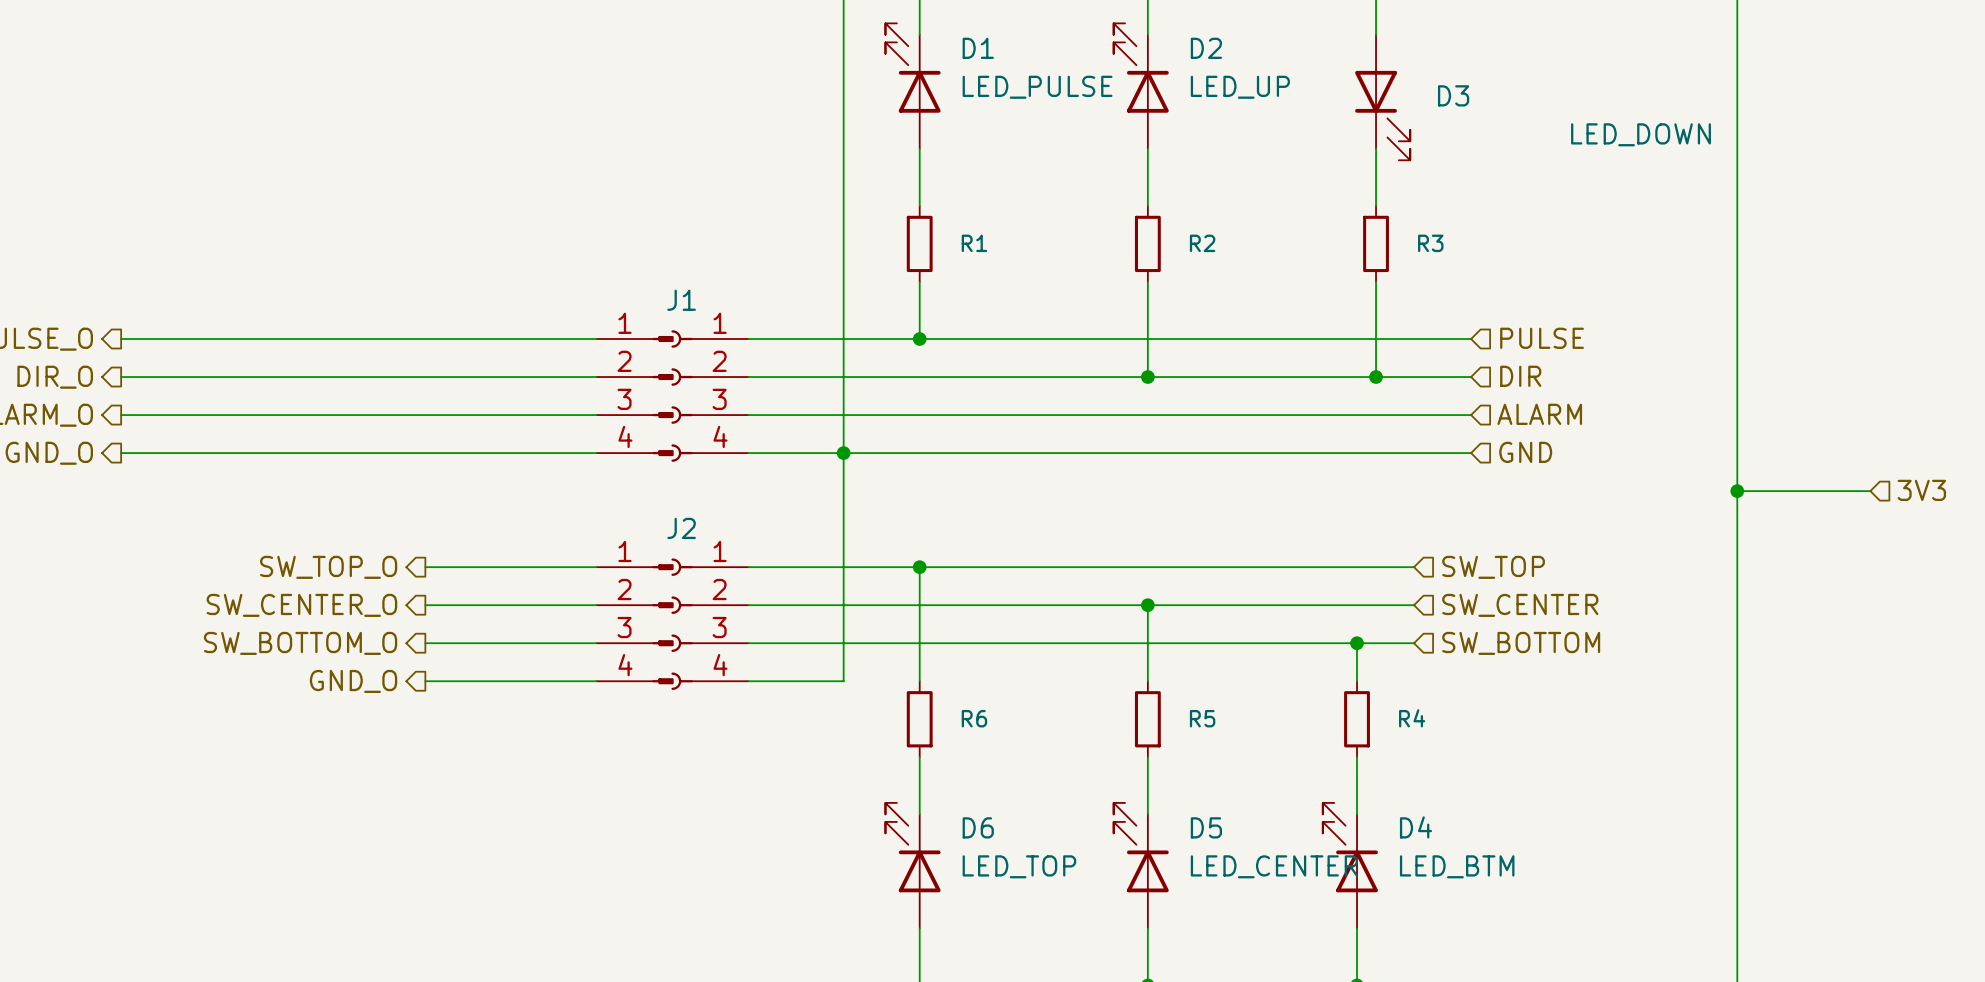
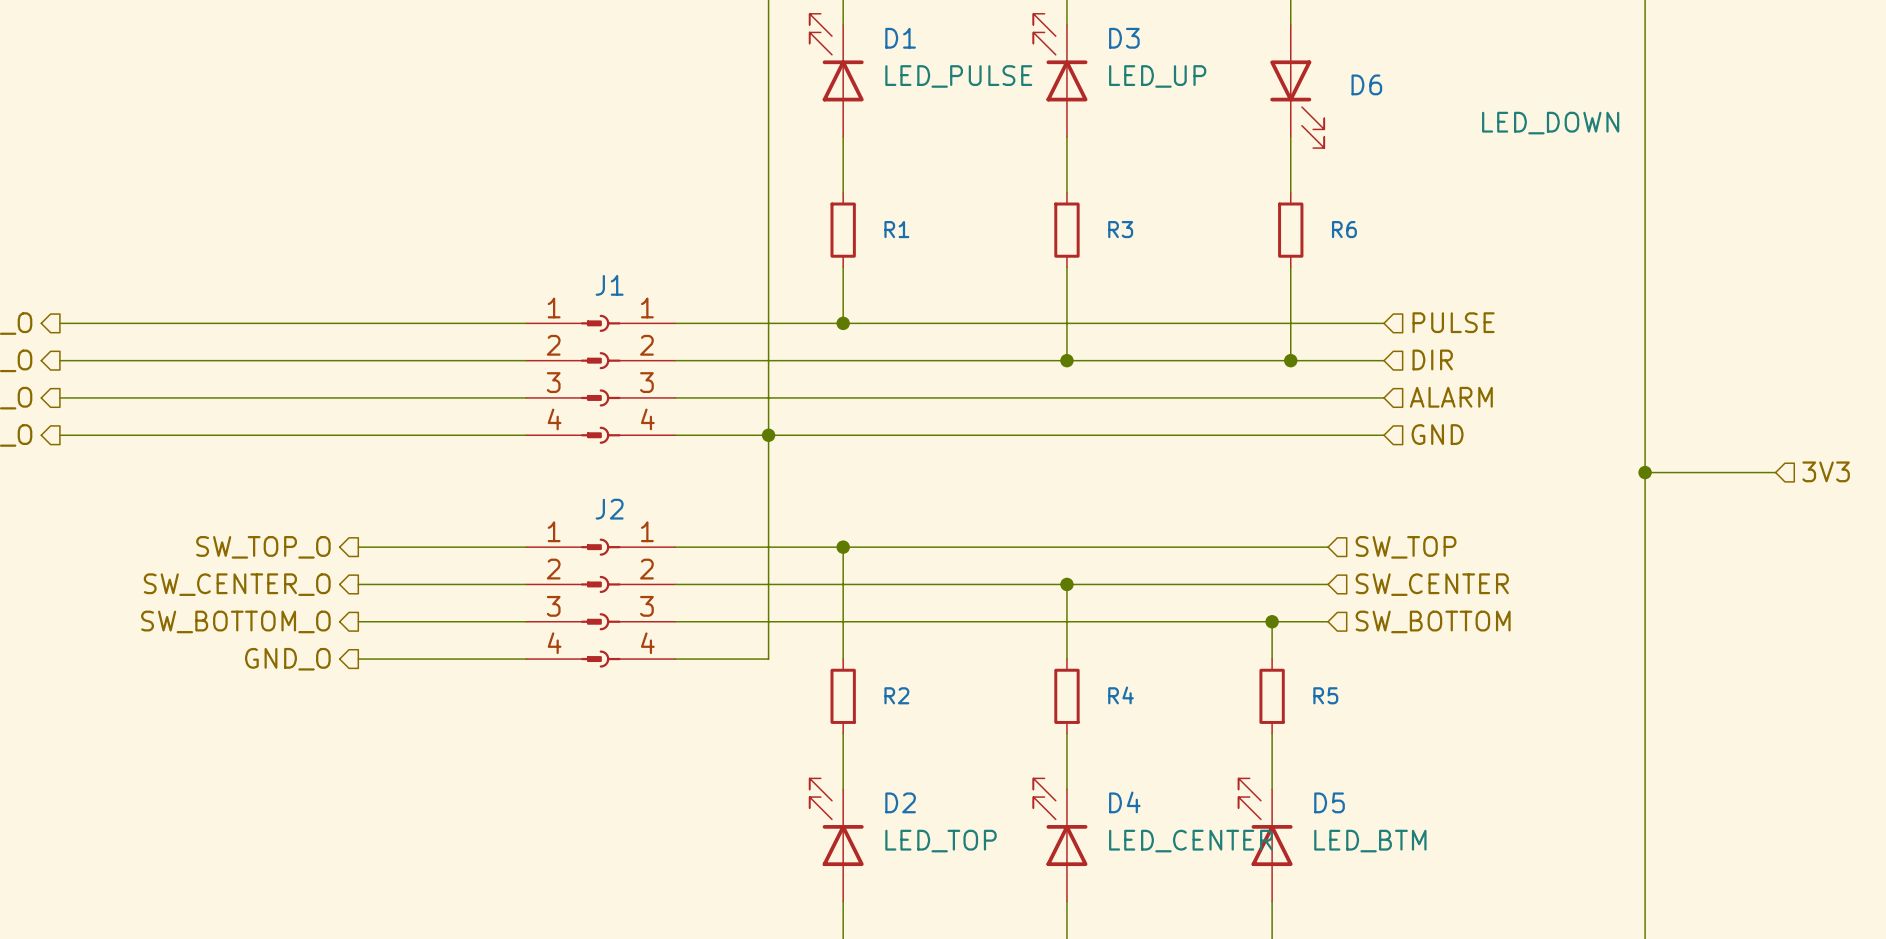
D2 name: D2 (1206, 48) -> D3 (1124, 38)
D3 name: D3 (1453, 95) -> D6 (1366, 84)
R2 name: R2 (1202, 243) -> R3 (1120, 229)
R3 name: R3 (1430, 243) -> R6 (1344, 229)
R6 name: R6 (974, 718) -> R2 (896, 695)
R5 name: R5 (1202, 718) -> R4 (1121, 695)
R4 name: R4 (1412, 718) -> R5 (1325, 695)
D6 name: D6 (978, 827) -> D2 (900, 802)
D5 name: D5 (1206, 827) -> D4 (1124, 802)
D4 name: D4 (1416, 827) -> D5 (1329, 802)

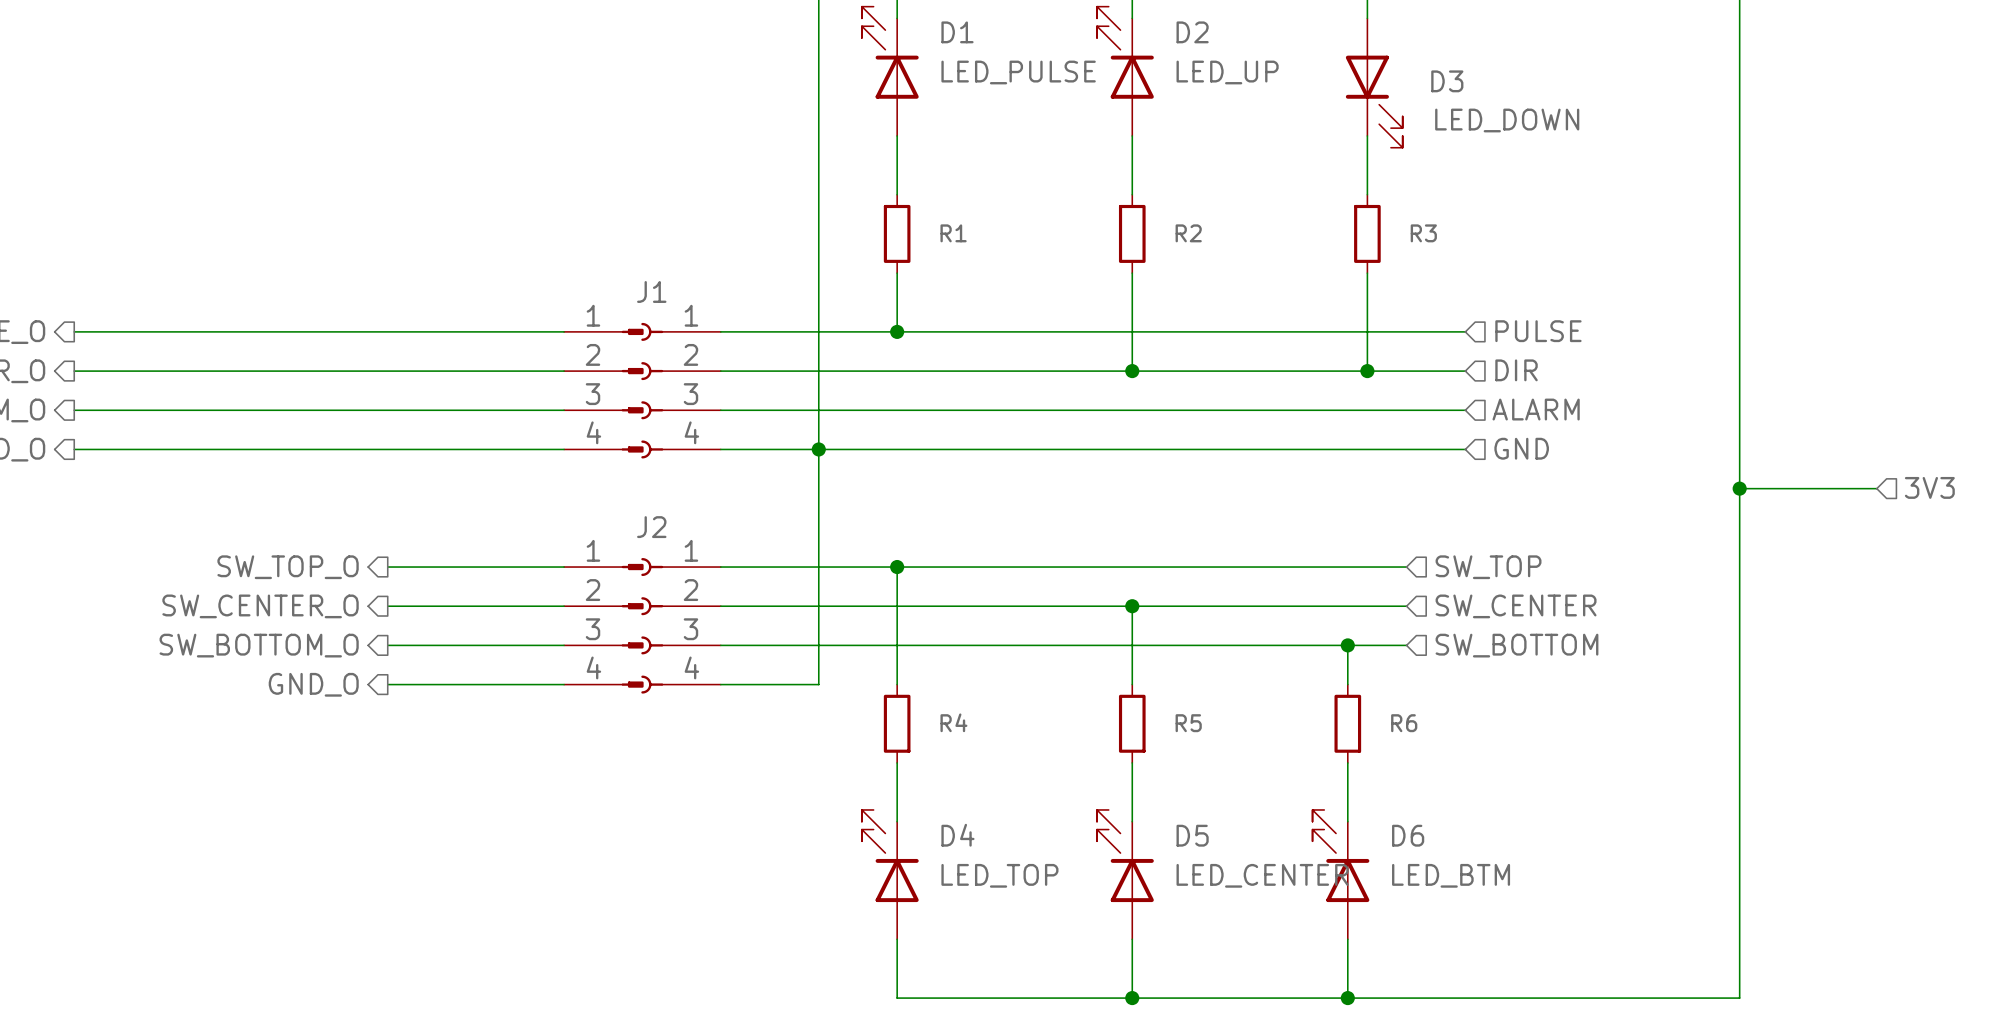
D3 name: D3 (1124, 38) -> D2 (1192, 32)
D6 name: D6 (1366, 84) -> D3 (1447, 81)
D6 value position: LED_DOWN (1550, 123) -> LED_DOWN (1507, 120)
R3 name: R3 (1120, 229) -> R2 (1188, 233)
R6 name: R6 (1344, 229) -> R3 (1423, 233)
R2 name: R2 (896, 695) -> R4 (953, 722)
R4 name: R4 (1121, 695) -> R5 (1188, 723)
R5 name: R5 (1325, 695) -> R6 (1404, 723)
D2 name: D2 (900, 802) -> D4 (957, 835)
D4 name: D4 (1124, 802) -> D5 (1192, 835)
D5 name: D5 (1329, 802) -> D6 (1408, 835)

